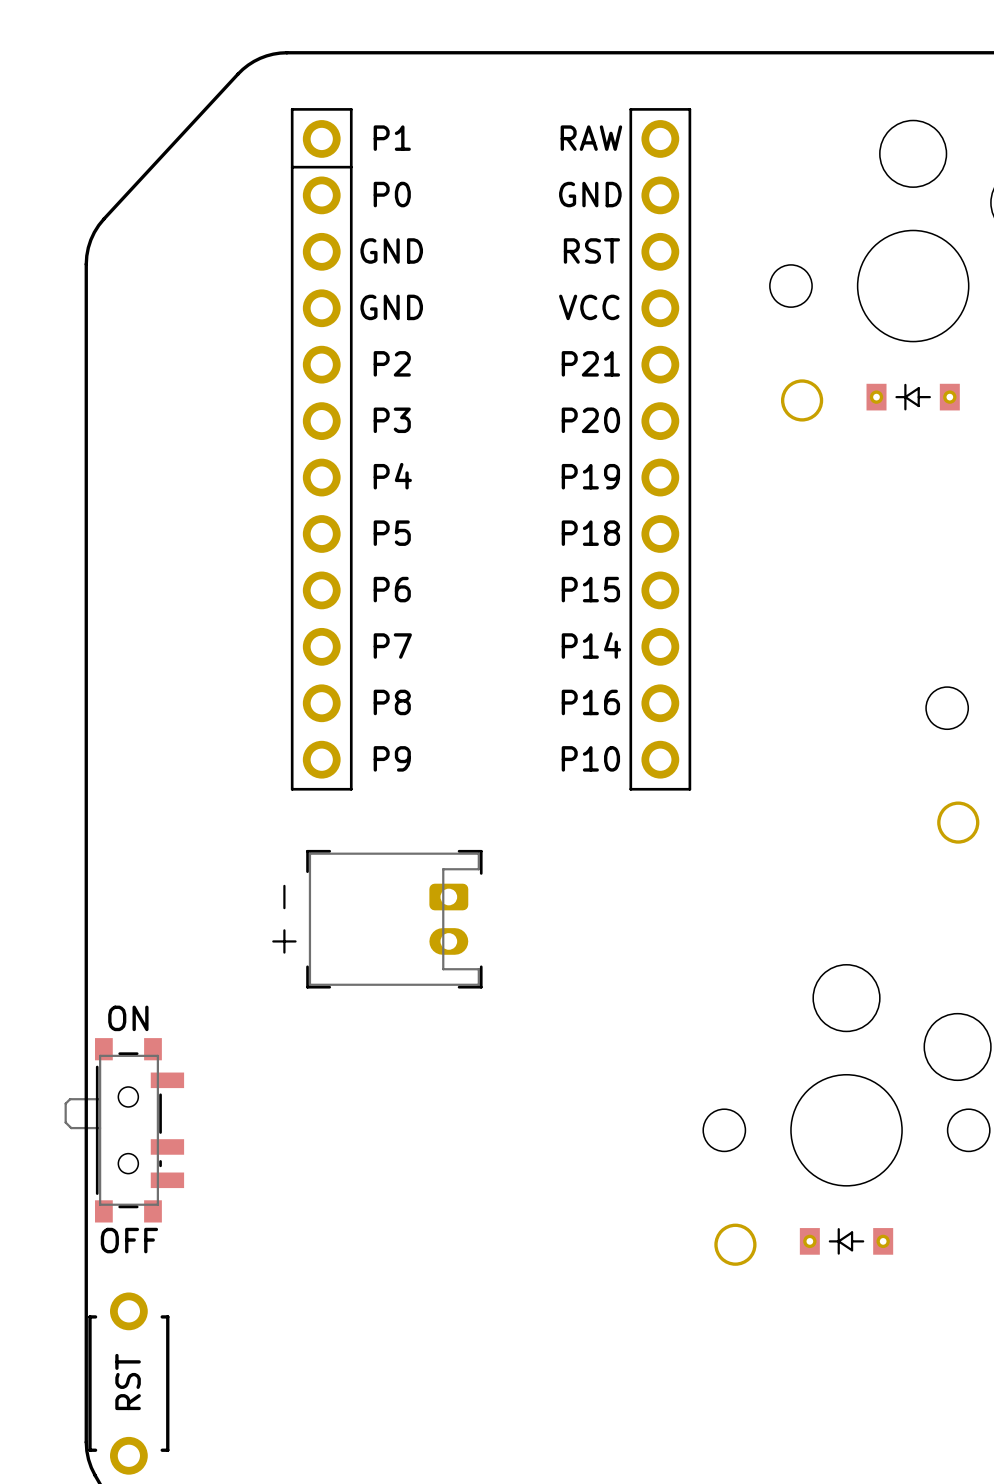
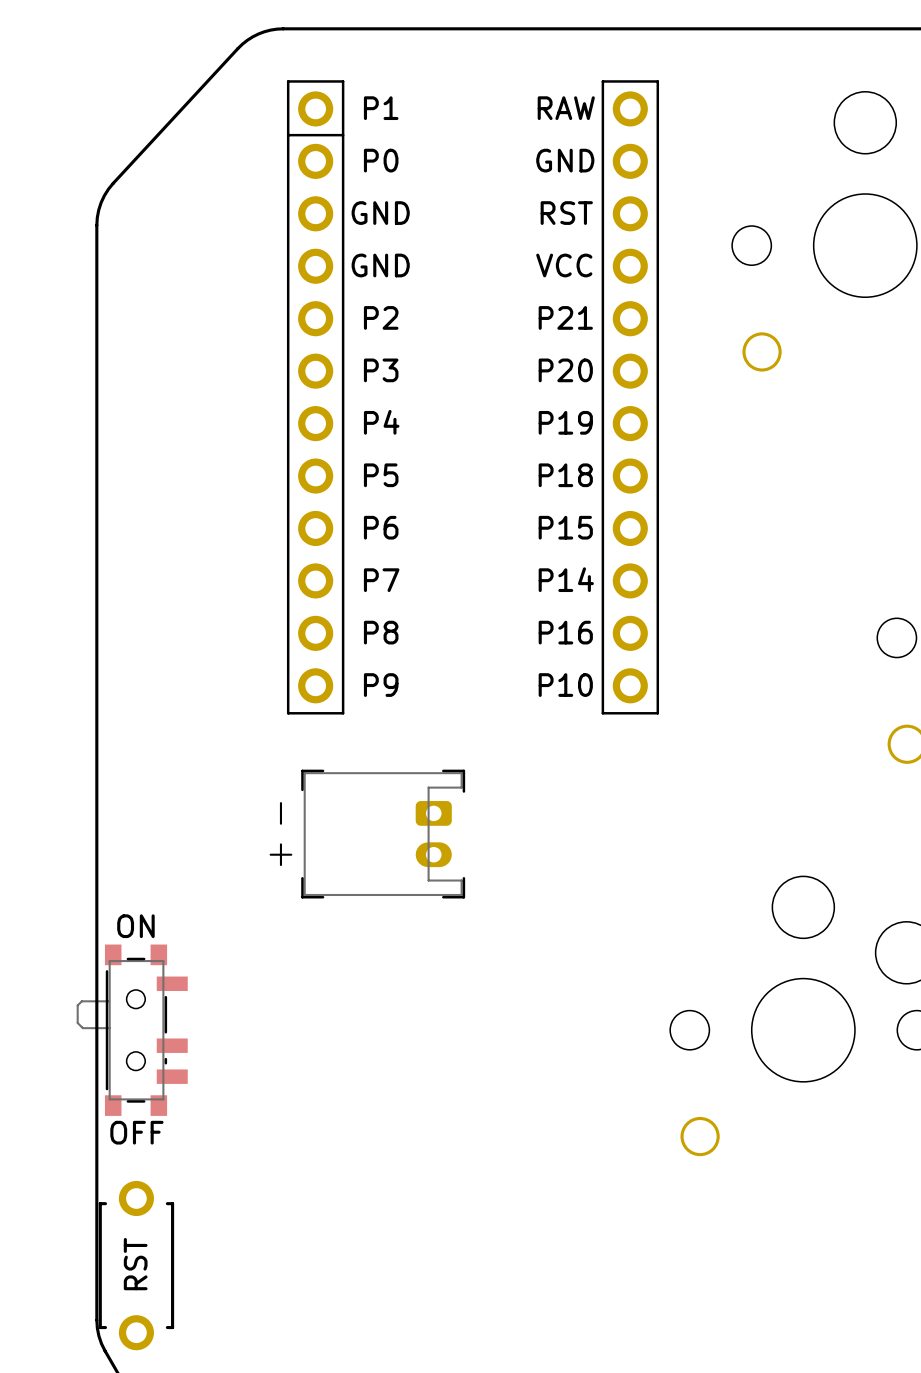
part: (913, 397) -> none
part: (846, 1241) -> none

